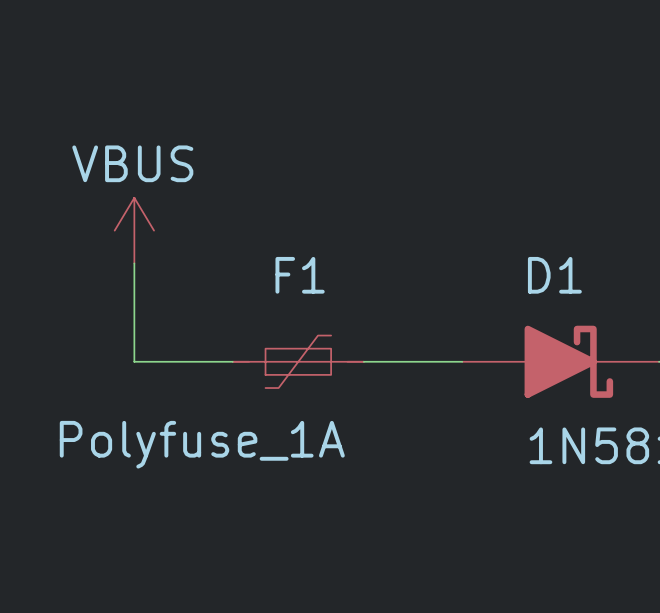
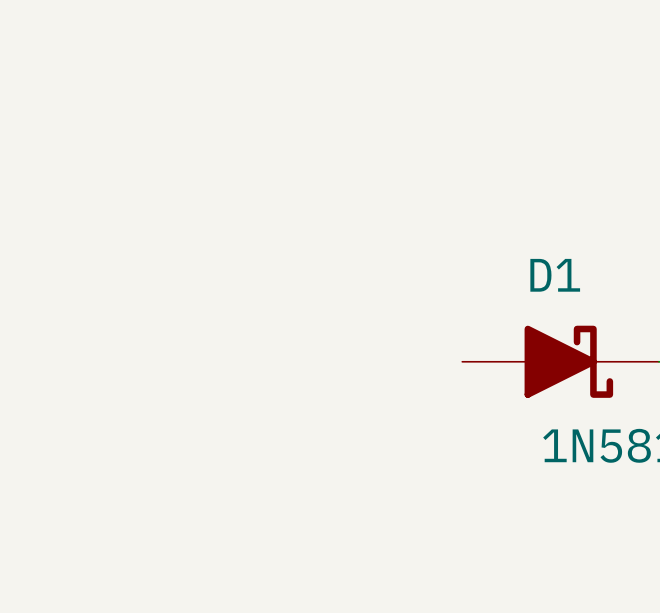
power symbol: VBUS (134, 230) -> none
wire: (134, 263) (134, 361) (232, 361) -> none
F1: Polyfuse_1A (298, 361) -> none
wire: (363, 361) (462, 361) -> none

